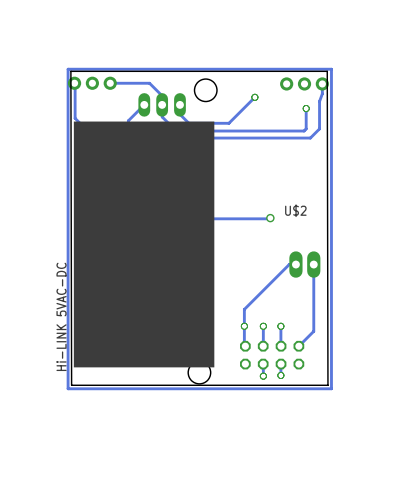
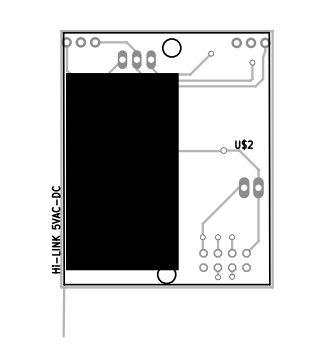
track: none -> (223, 150) (239, 150) (258, 169) (258, 187)
track: none -> (64, 286) (63, 336)

